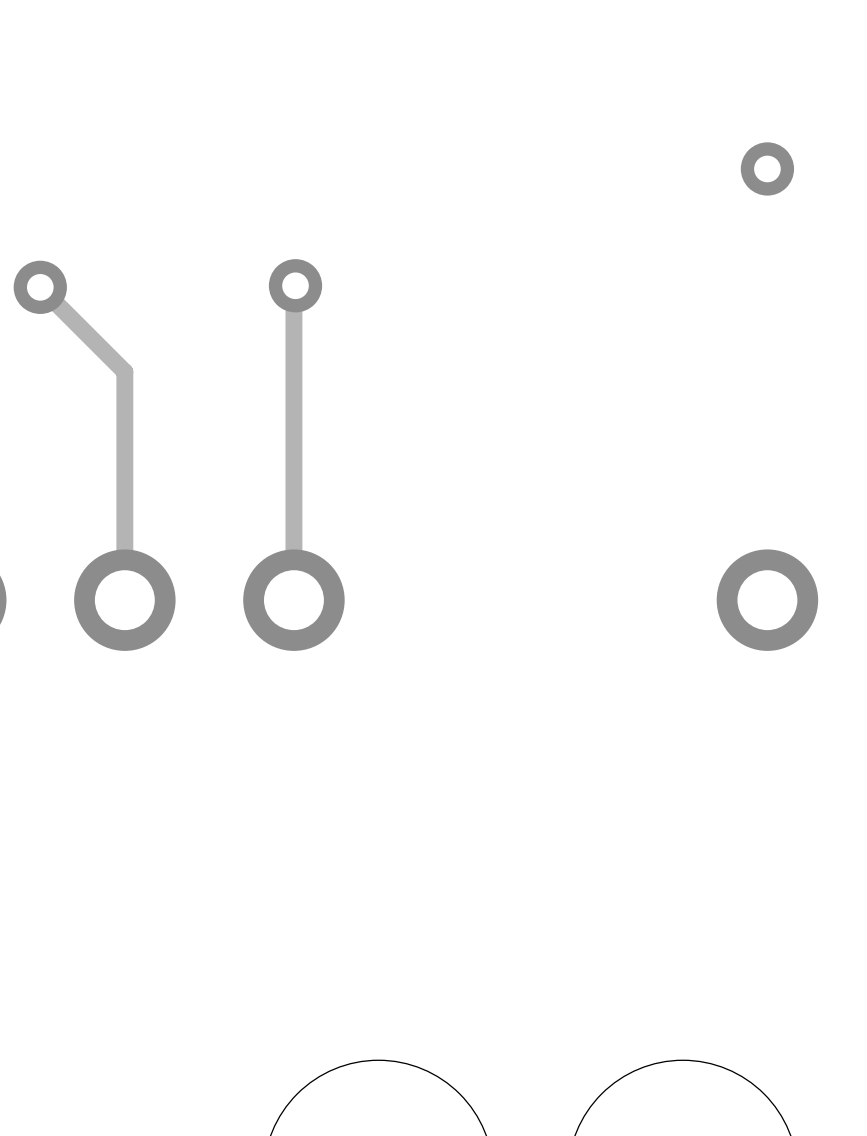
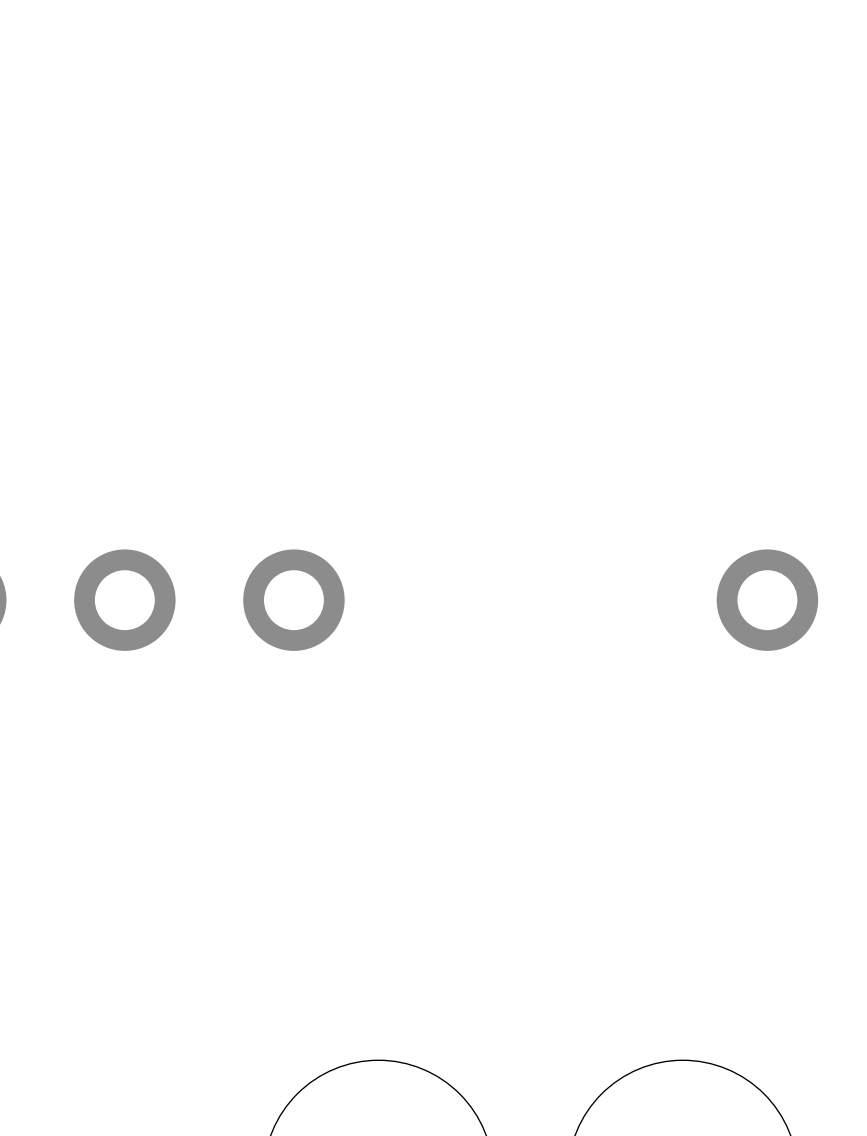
via: (767, 168) -> none
track: (295, 285) (293, 287) (293, 600) -> none
via: (295, 285) -> none
track: (40, 287) (124, 371) (124, 600) -> none
via: (40, 287) -> none

